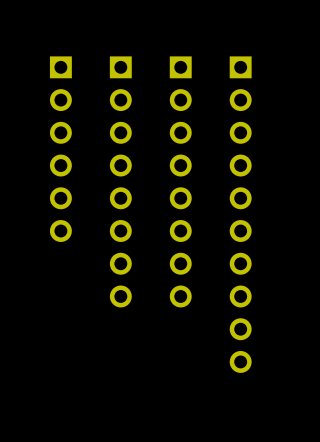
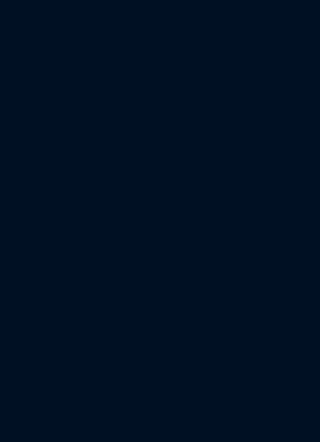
part: (60, 149) -> none
part: (120, 181) -> none
part: (180, 181) -> none
part: (240, 214) -> none

